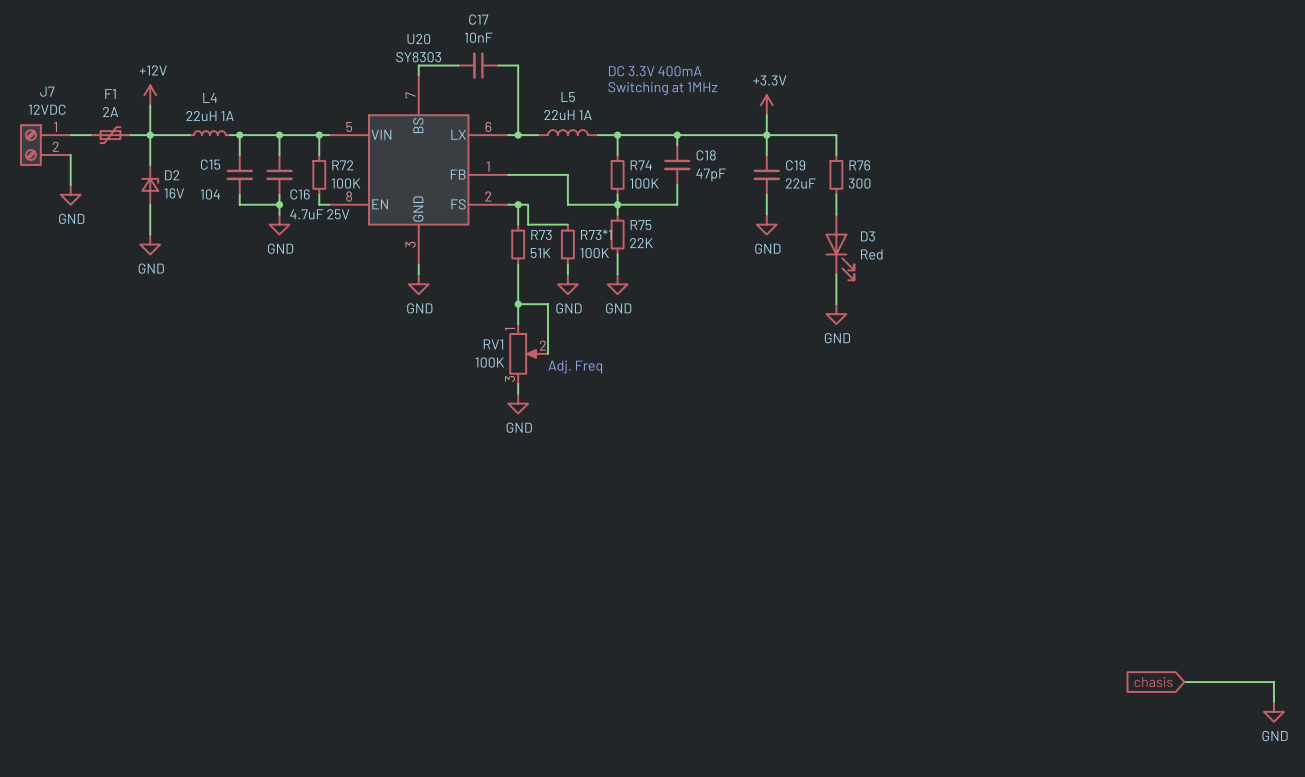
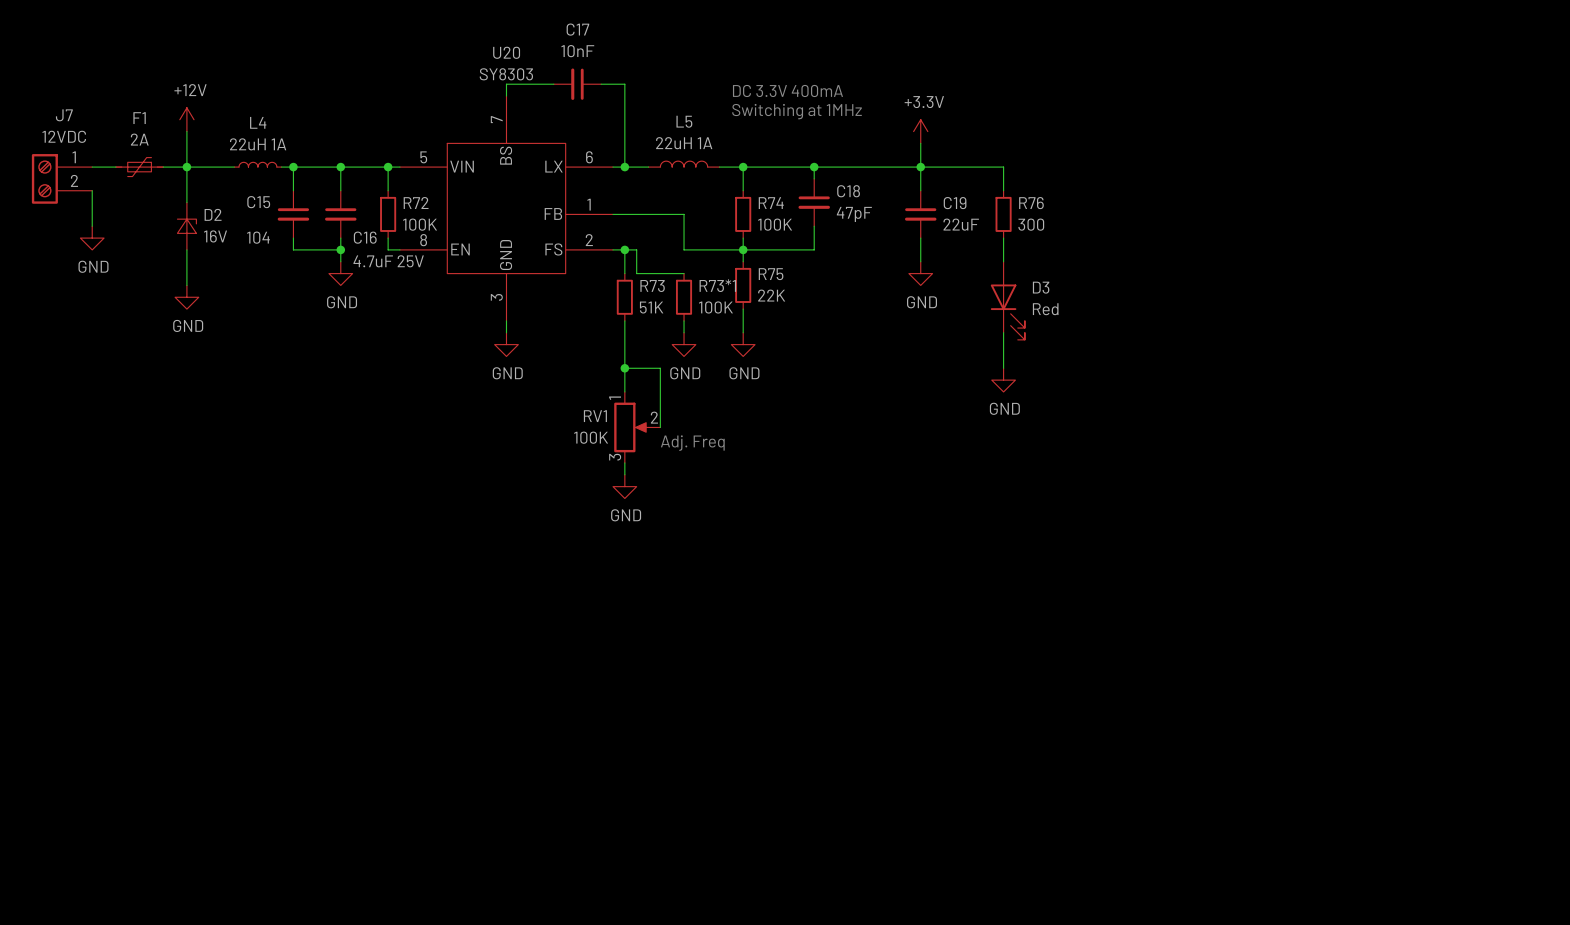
global label: chasis (1153, 682) -> none
wire: (1184, 682) (1273, 682) (1273, 701) -> none
power symbol: GND (1273, 711) -> none

